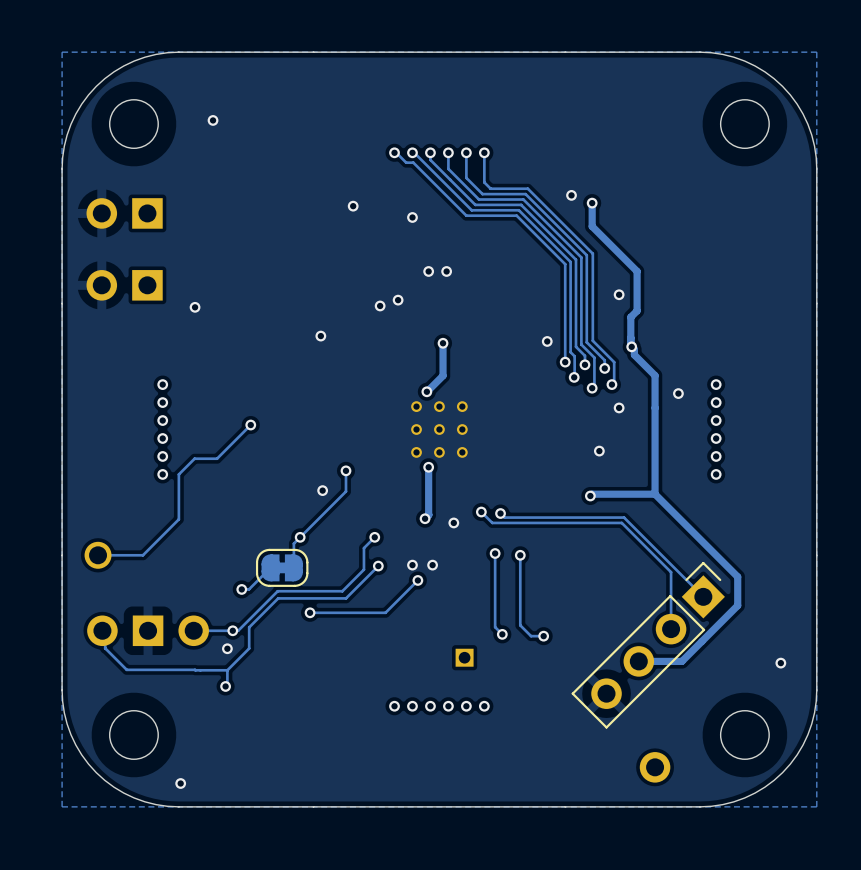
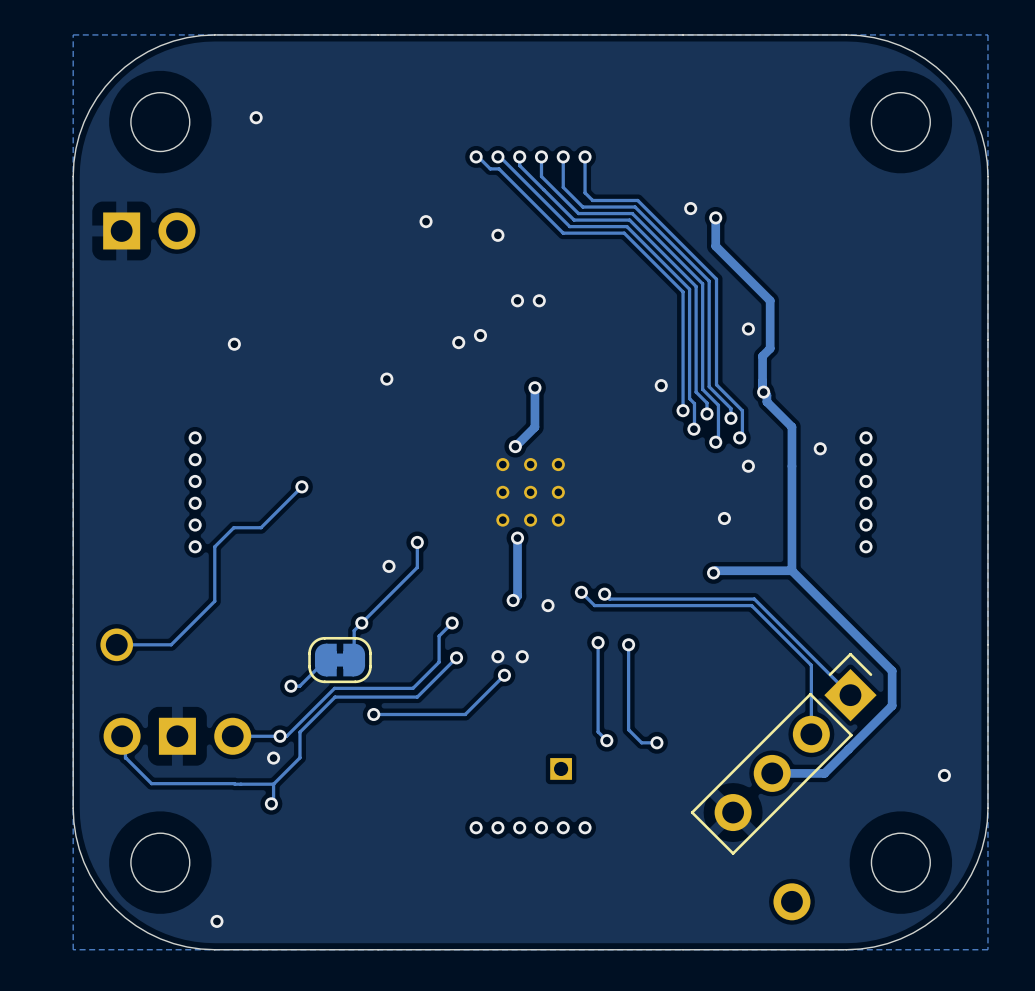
part rotation: 0° (124, 213) -> 180° (149, 230)
part: (124, 285) -> none

